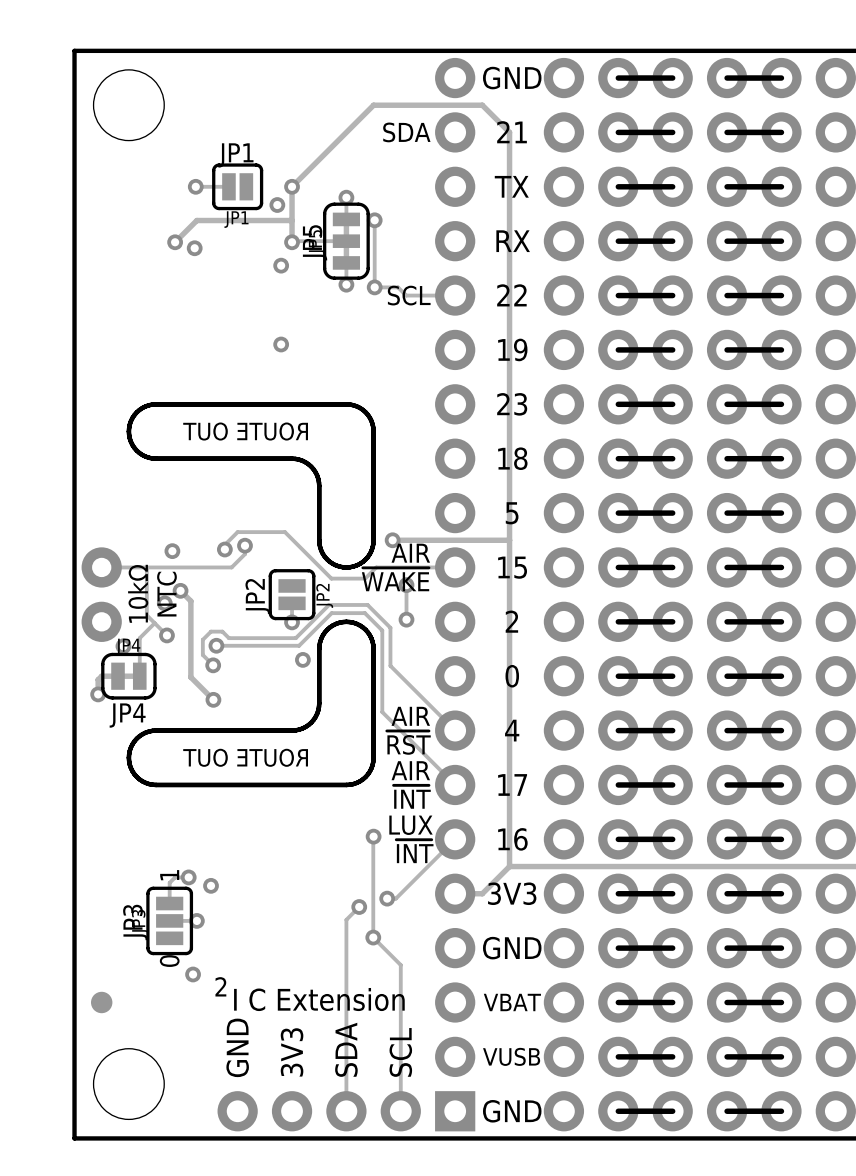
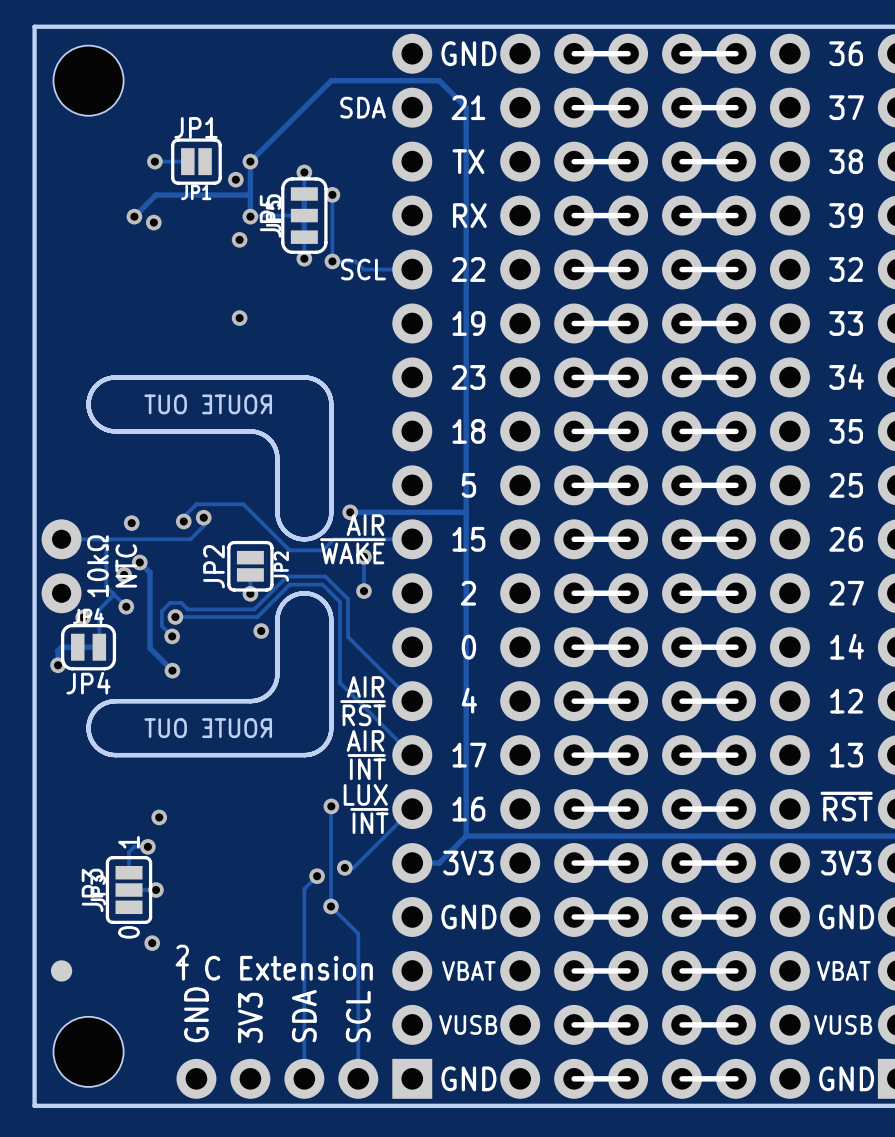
via position: (211, 885) -> (159, 817)

